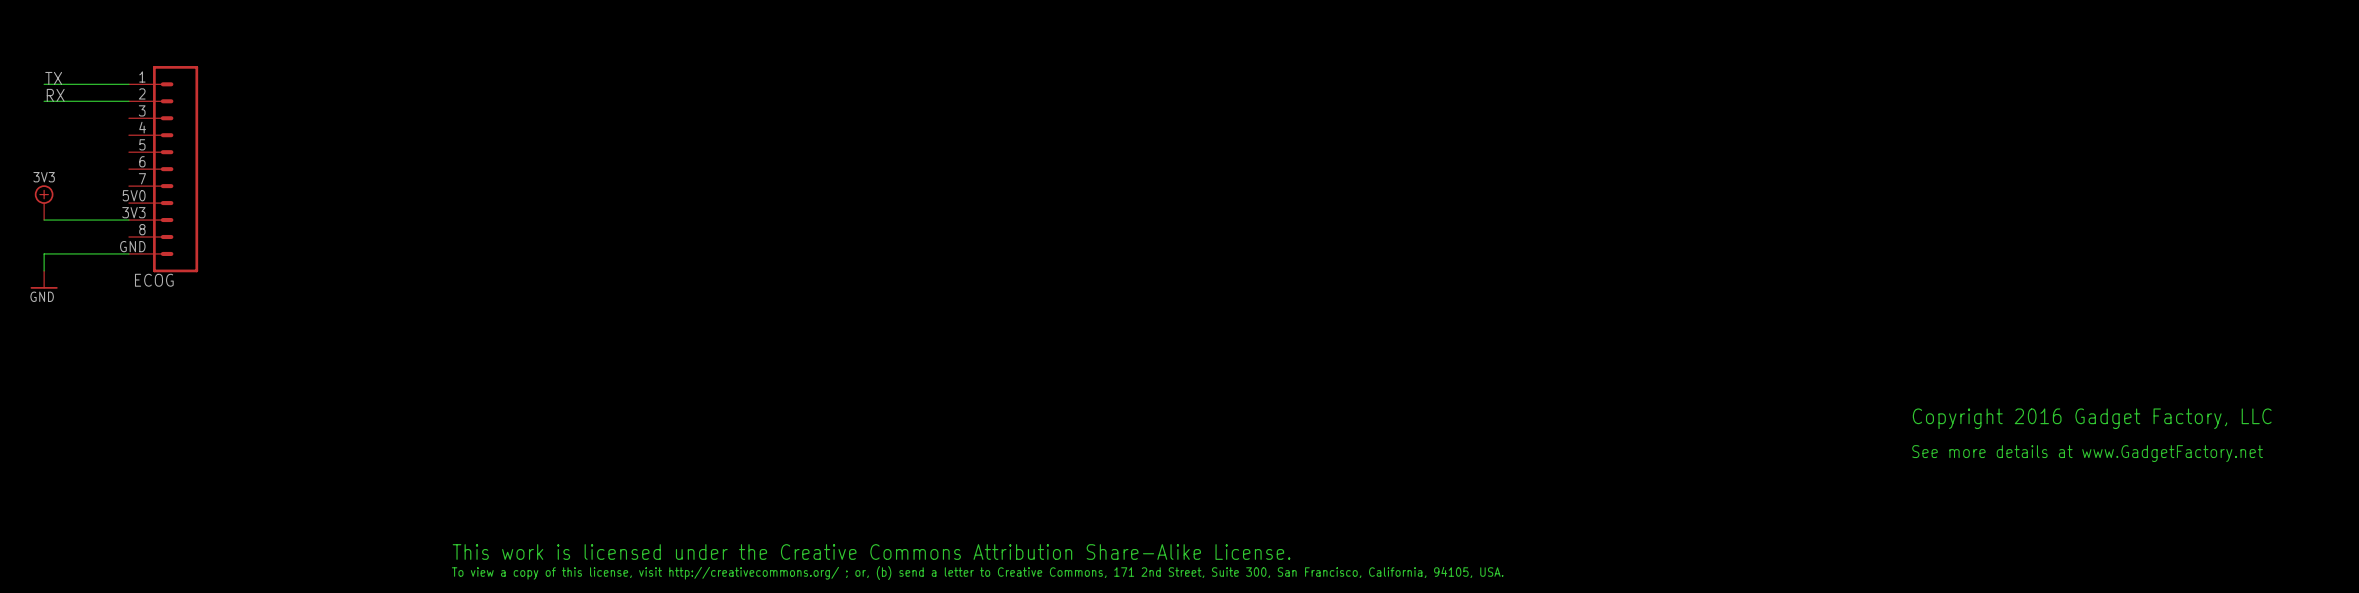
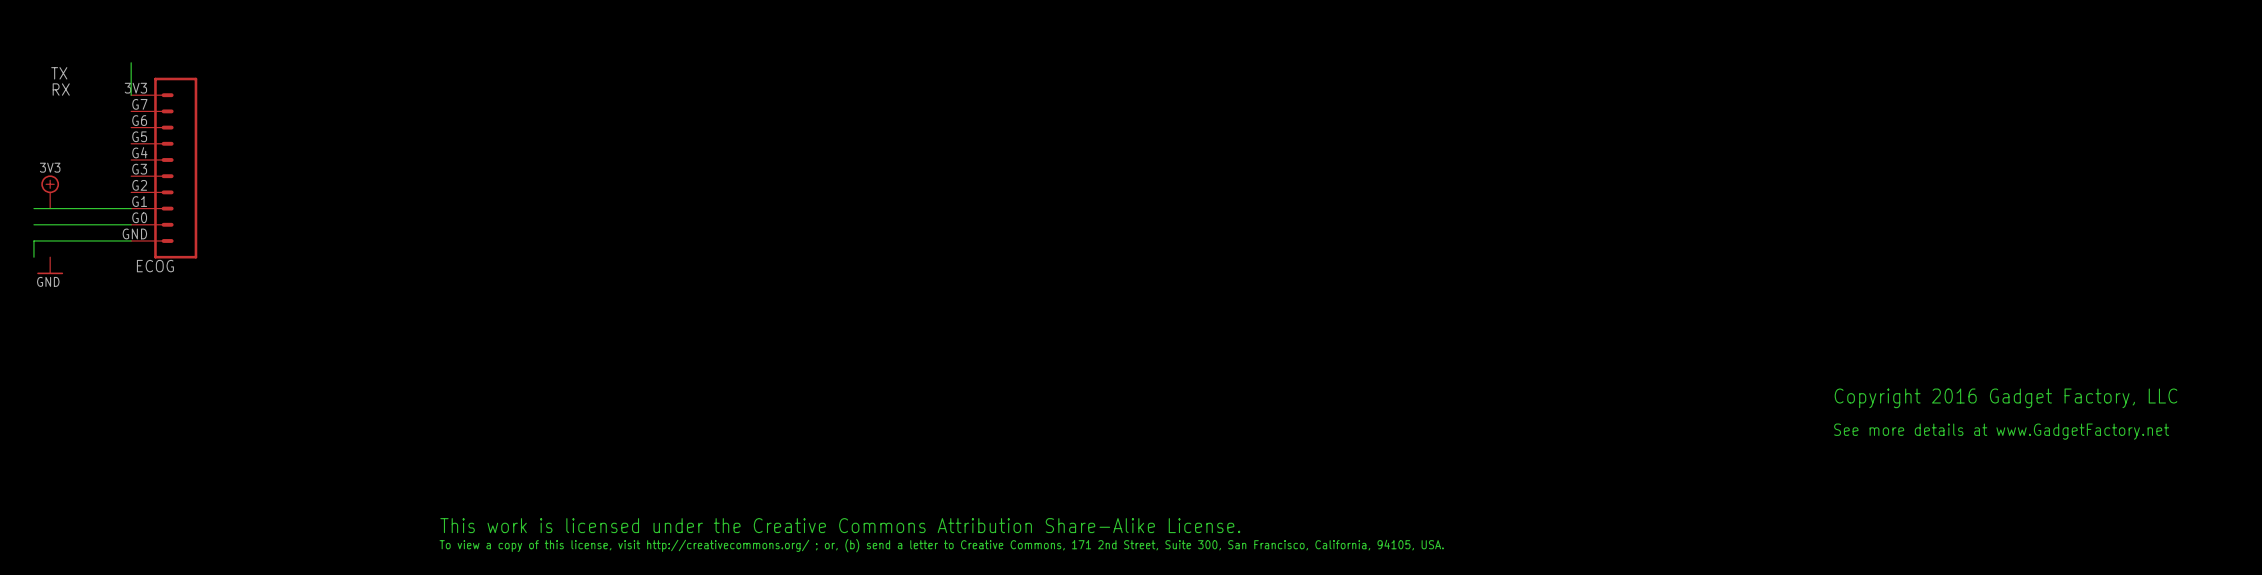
wire: (44, 84) (128, 84) -> none
wire: (44, 101) (128, 101) -> (131, 62) (131, 95)
ECOG: (163, 169) -> none
ECOG: none -> (164, 168)
wire: none -> (33, 208) (50, 208)
wire: none -> (33, 224) (131, 224)
wire: (44, 253) (44, 270) -> (50, 240) (33, 240) (33, 257)

